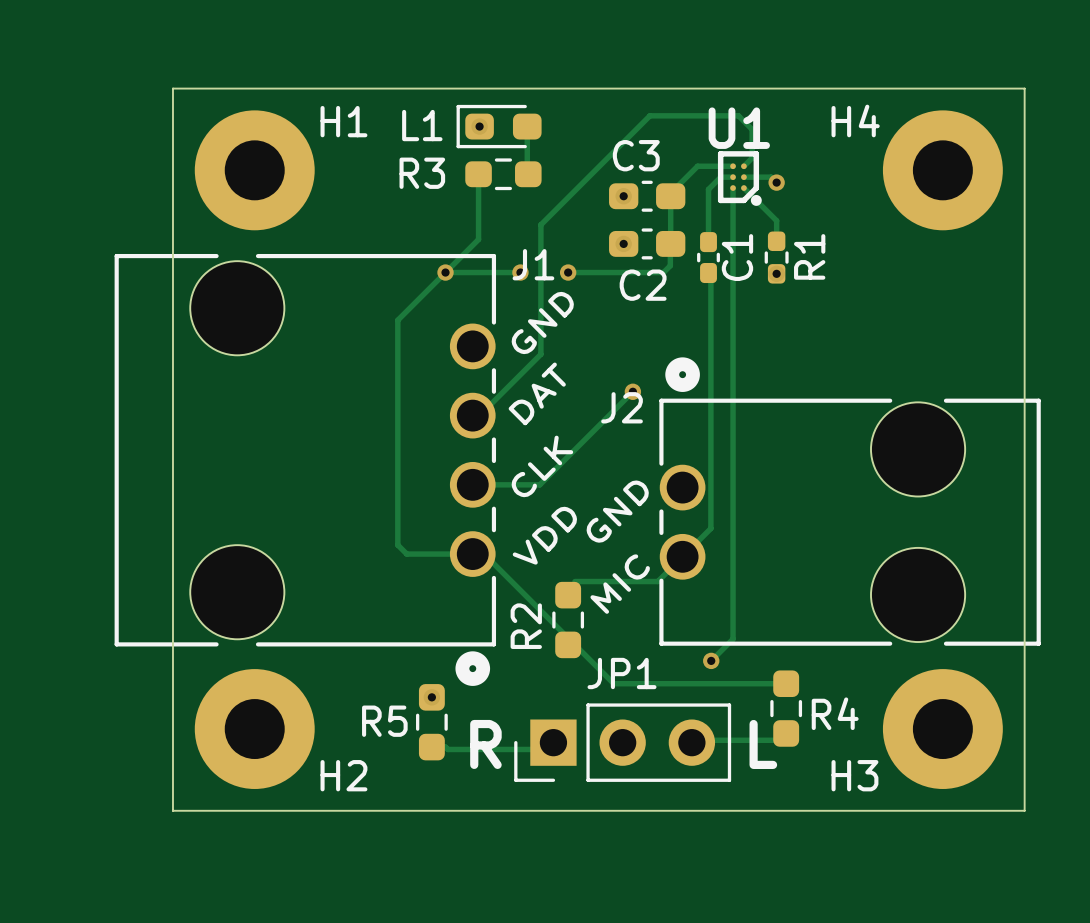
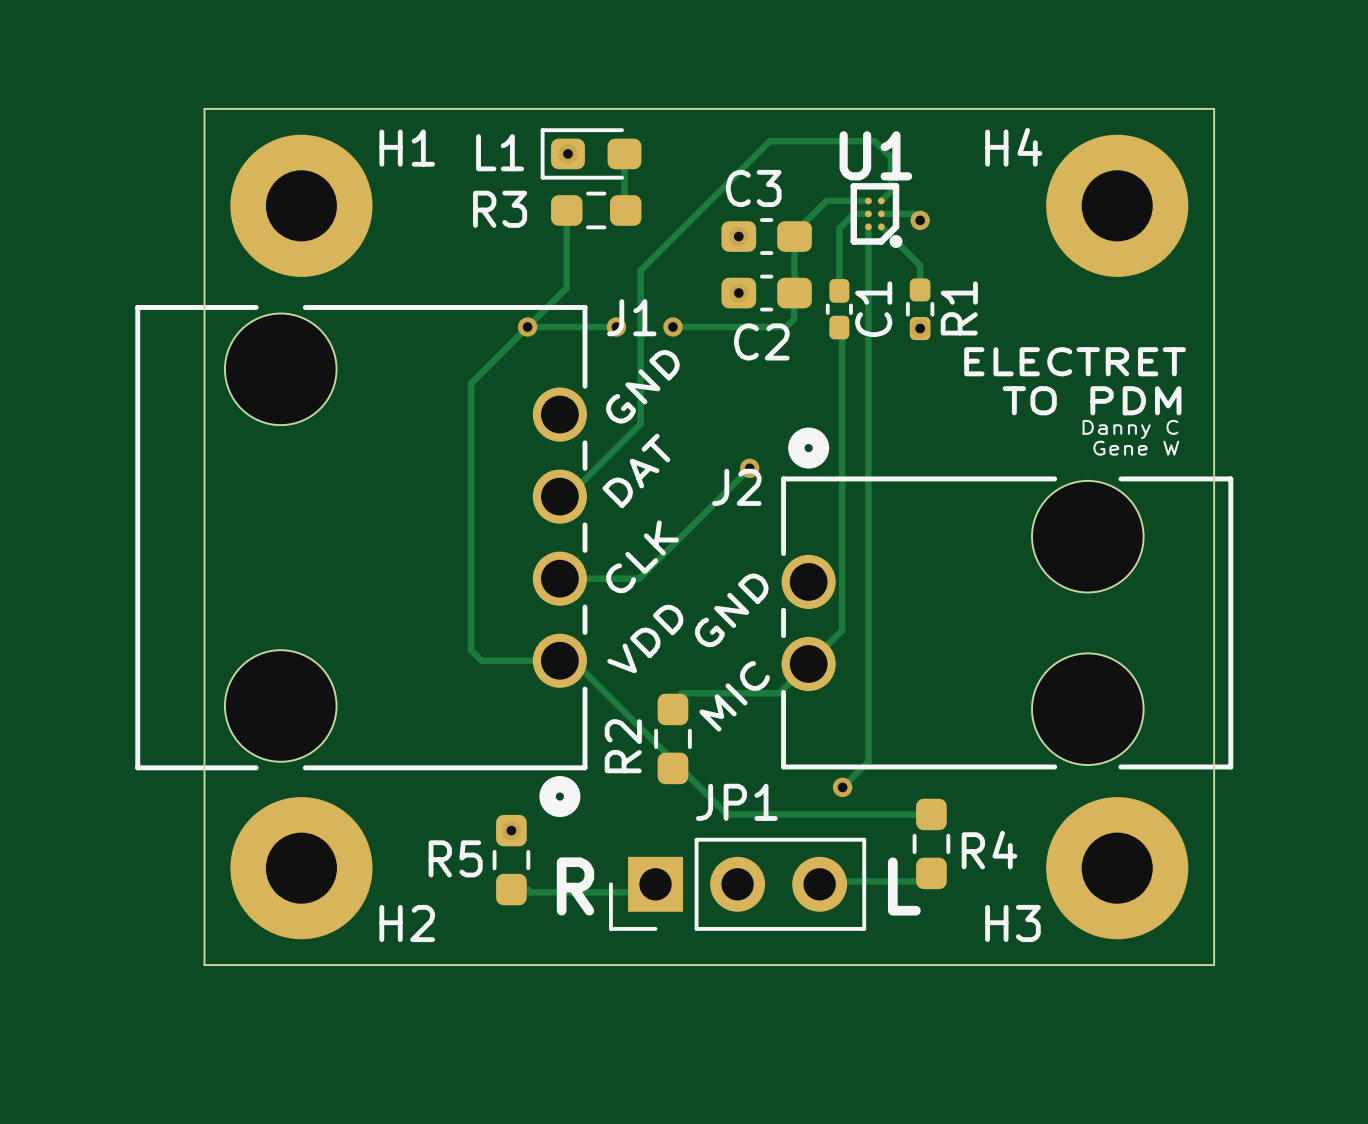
text: none -> ELECTRET (1075, 361)
text: none -> TO PDM (1092, 400)
text: none -> Danny C (1130, 429)
text: none -> Gene W (1136, 448)

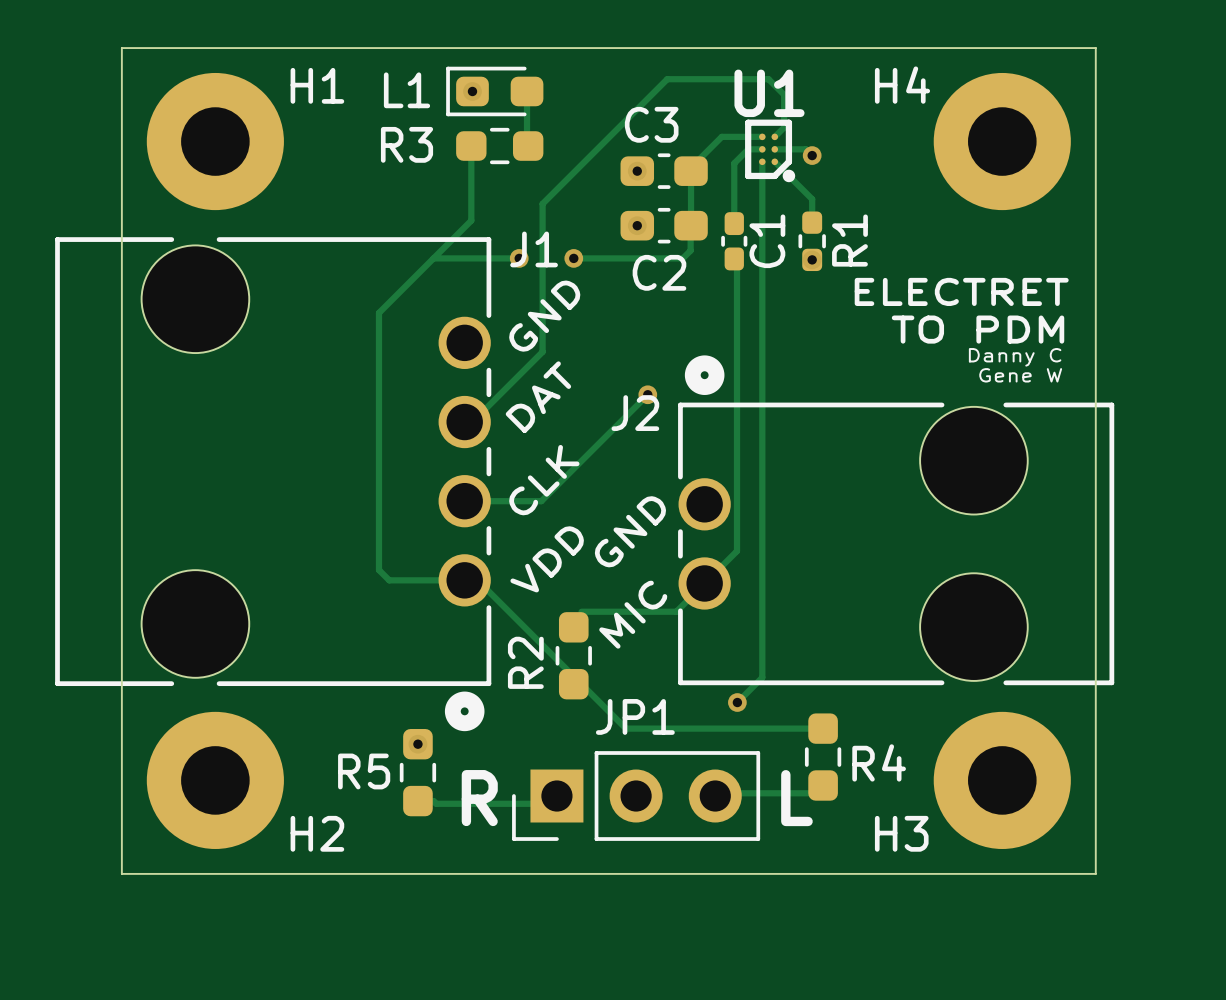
via: (527, 326) -> none

